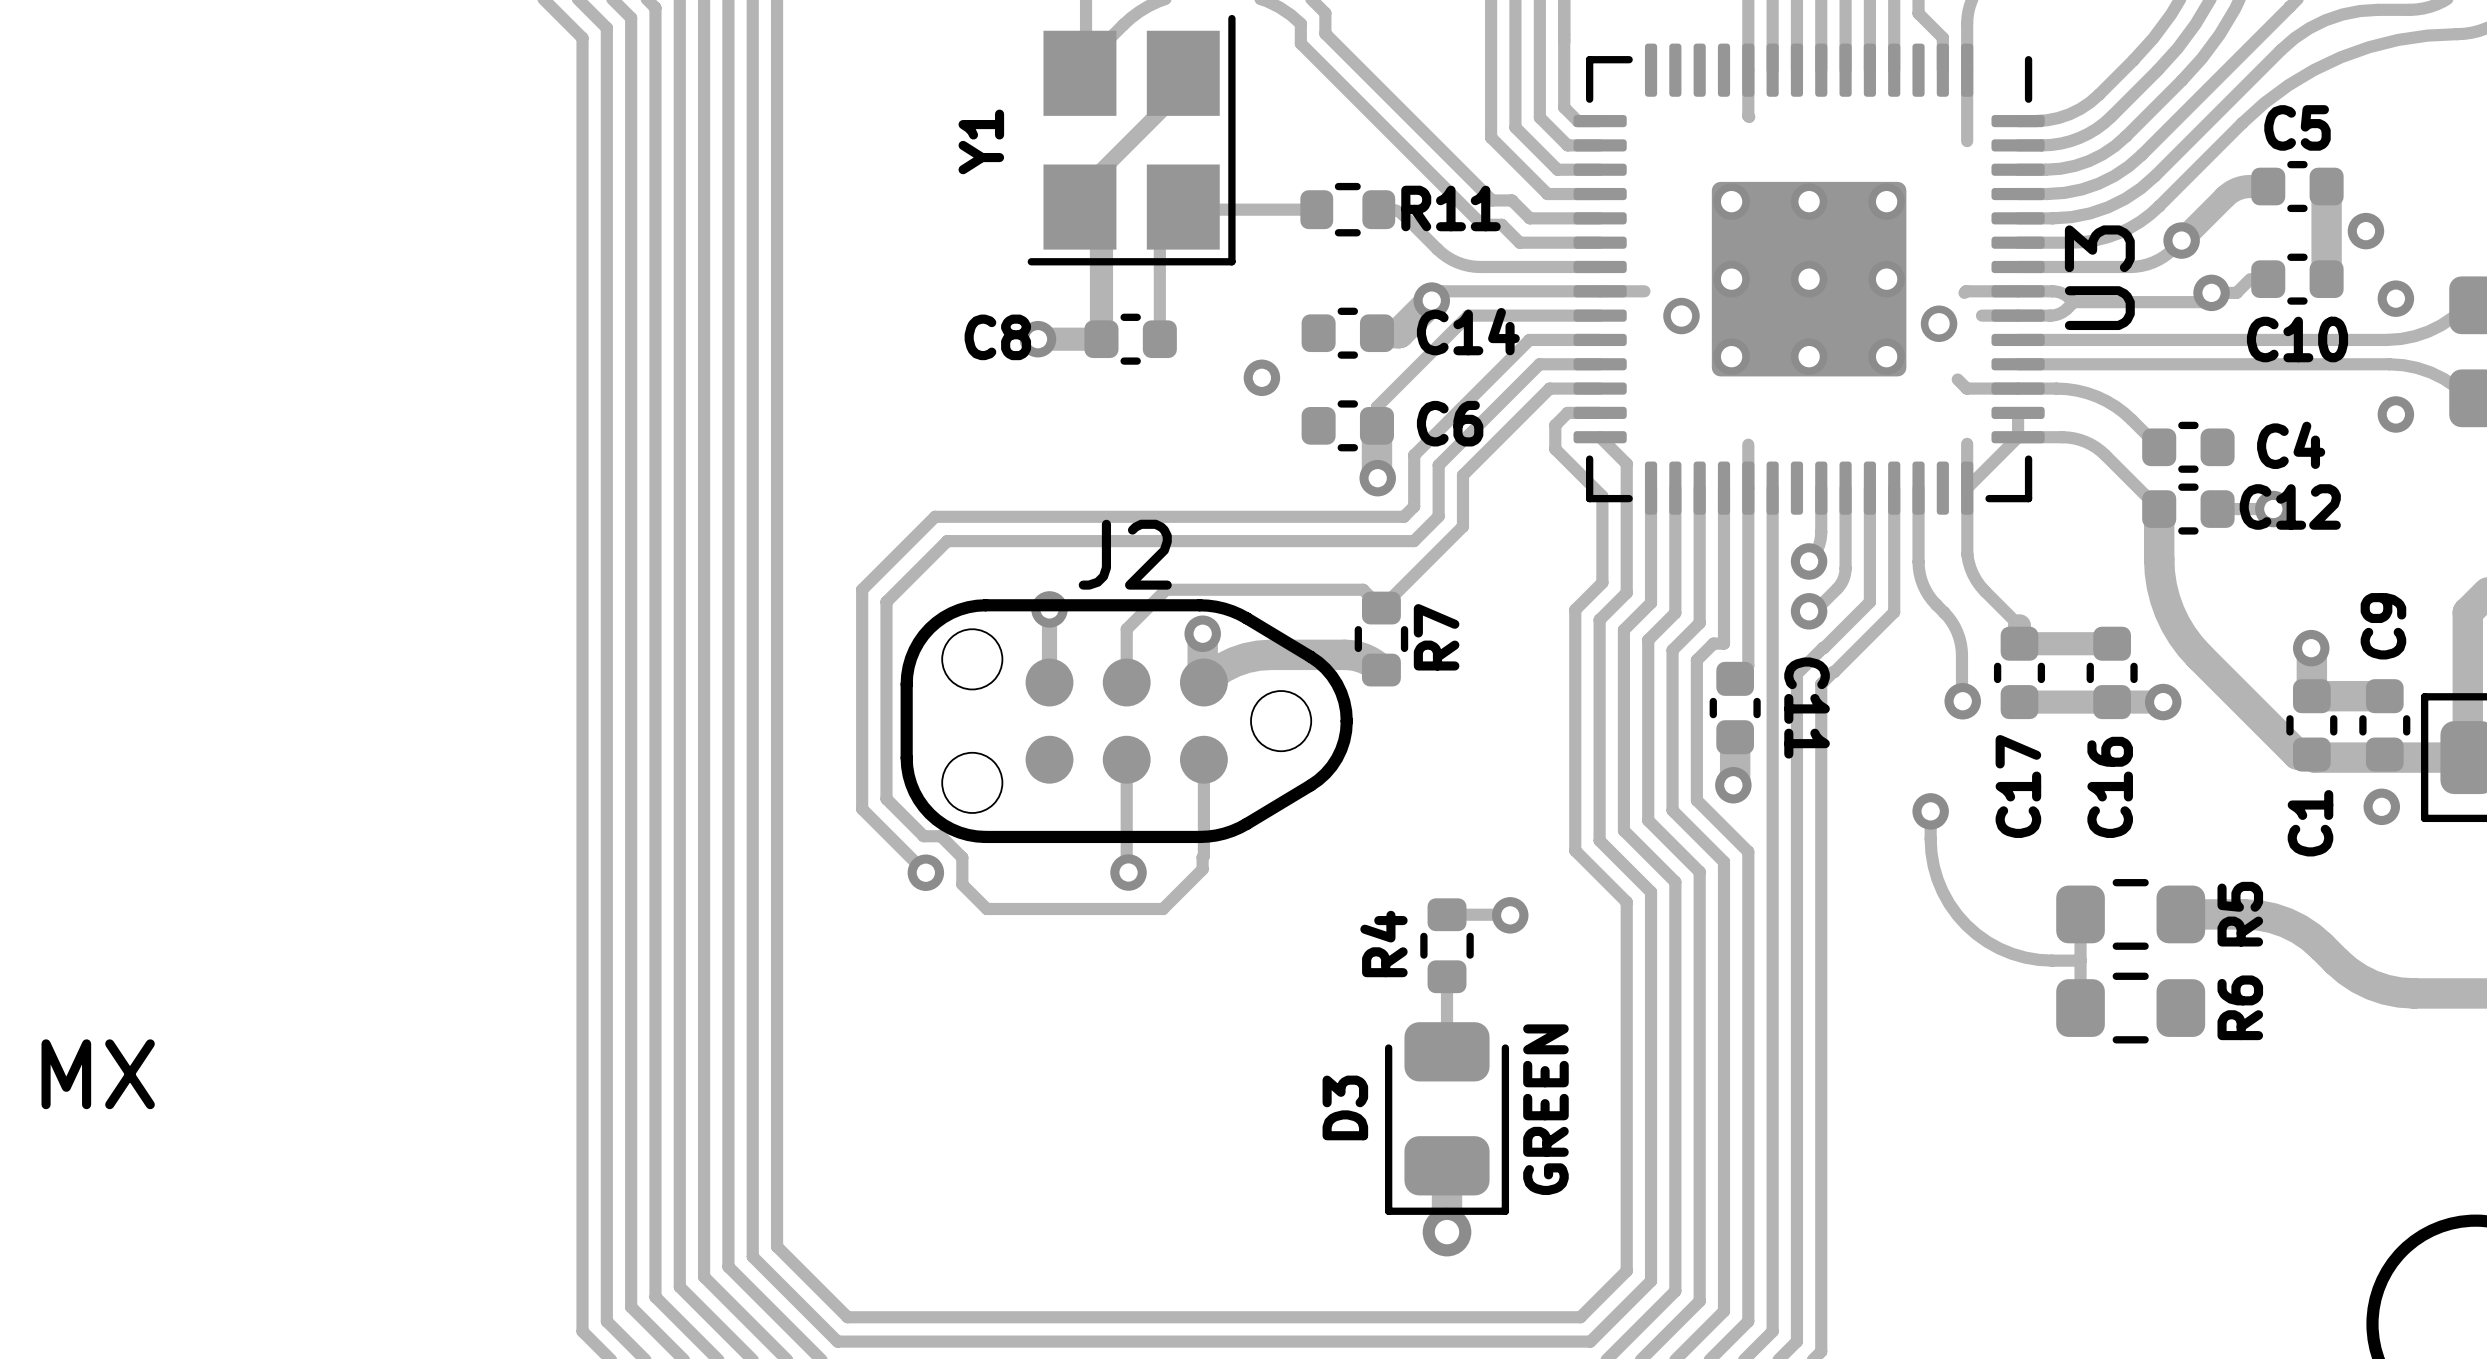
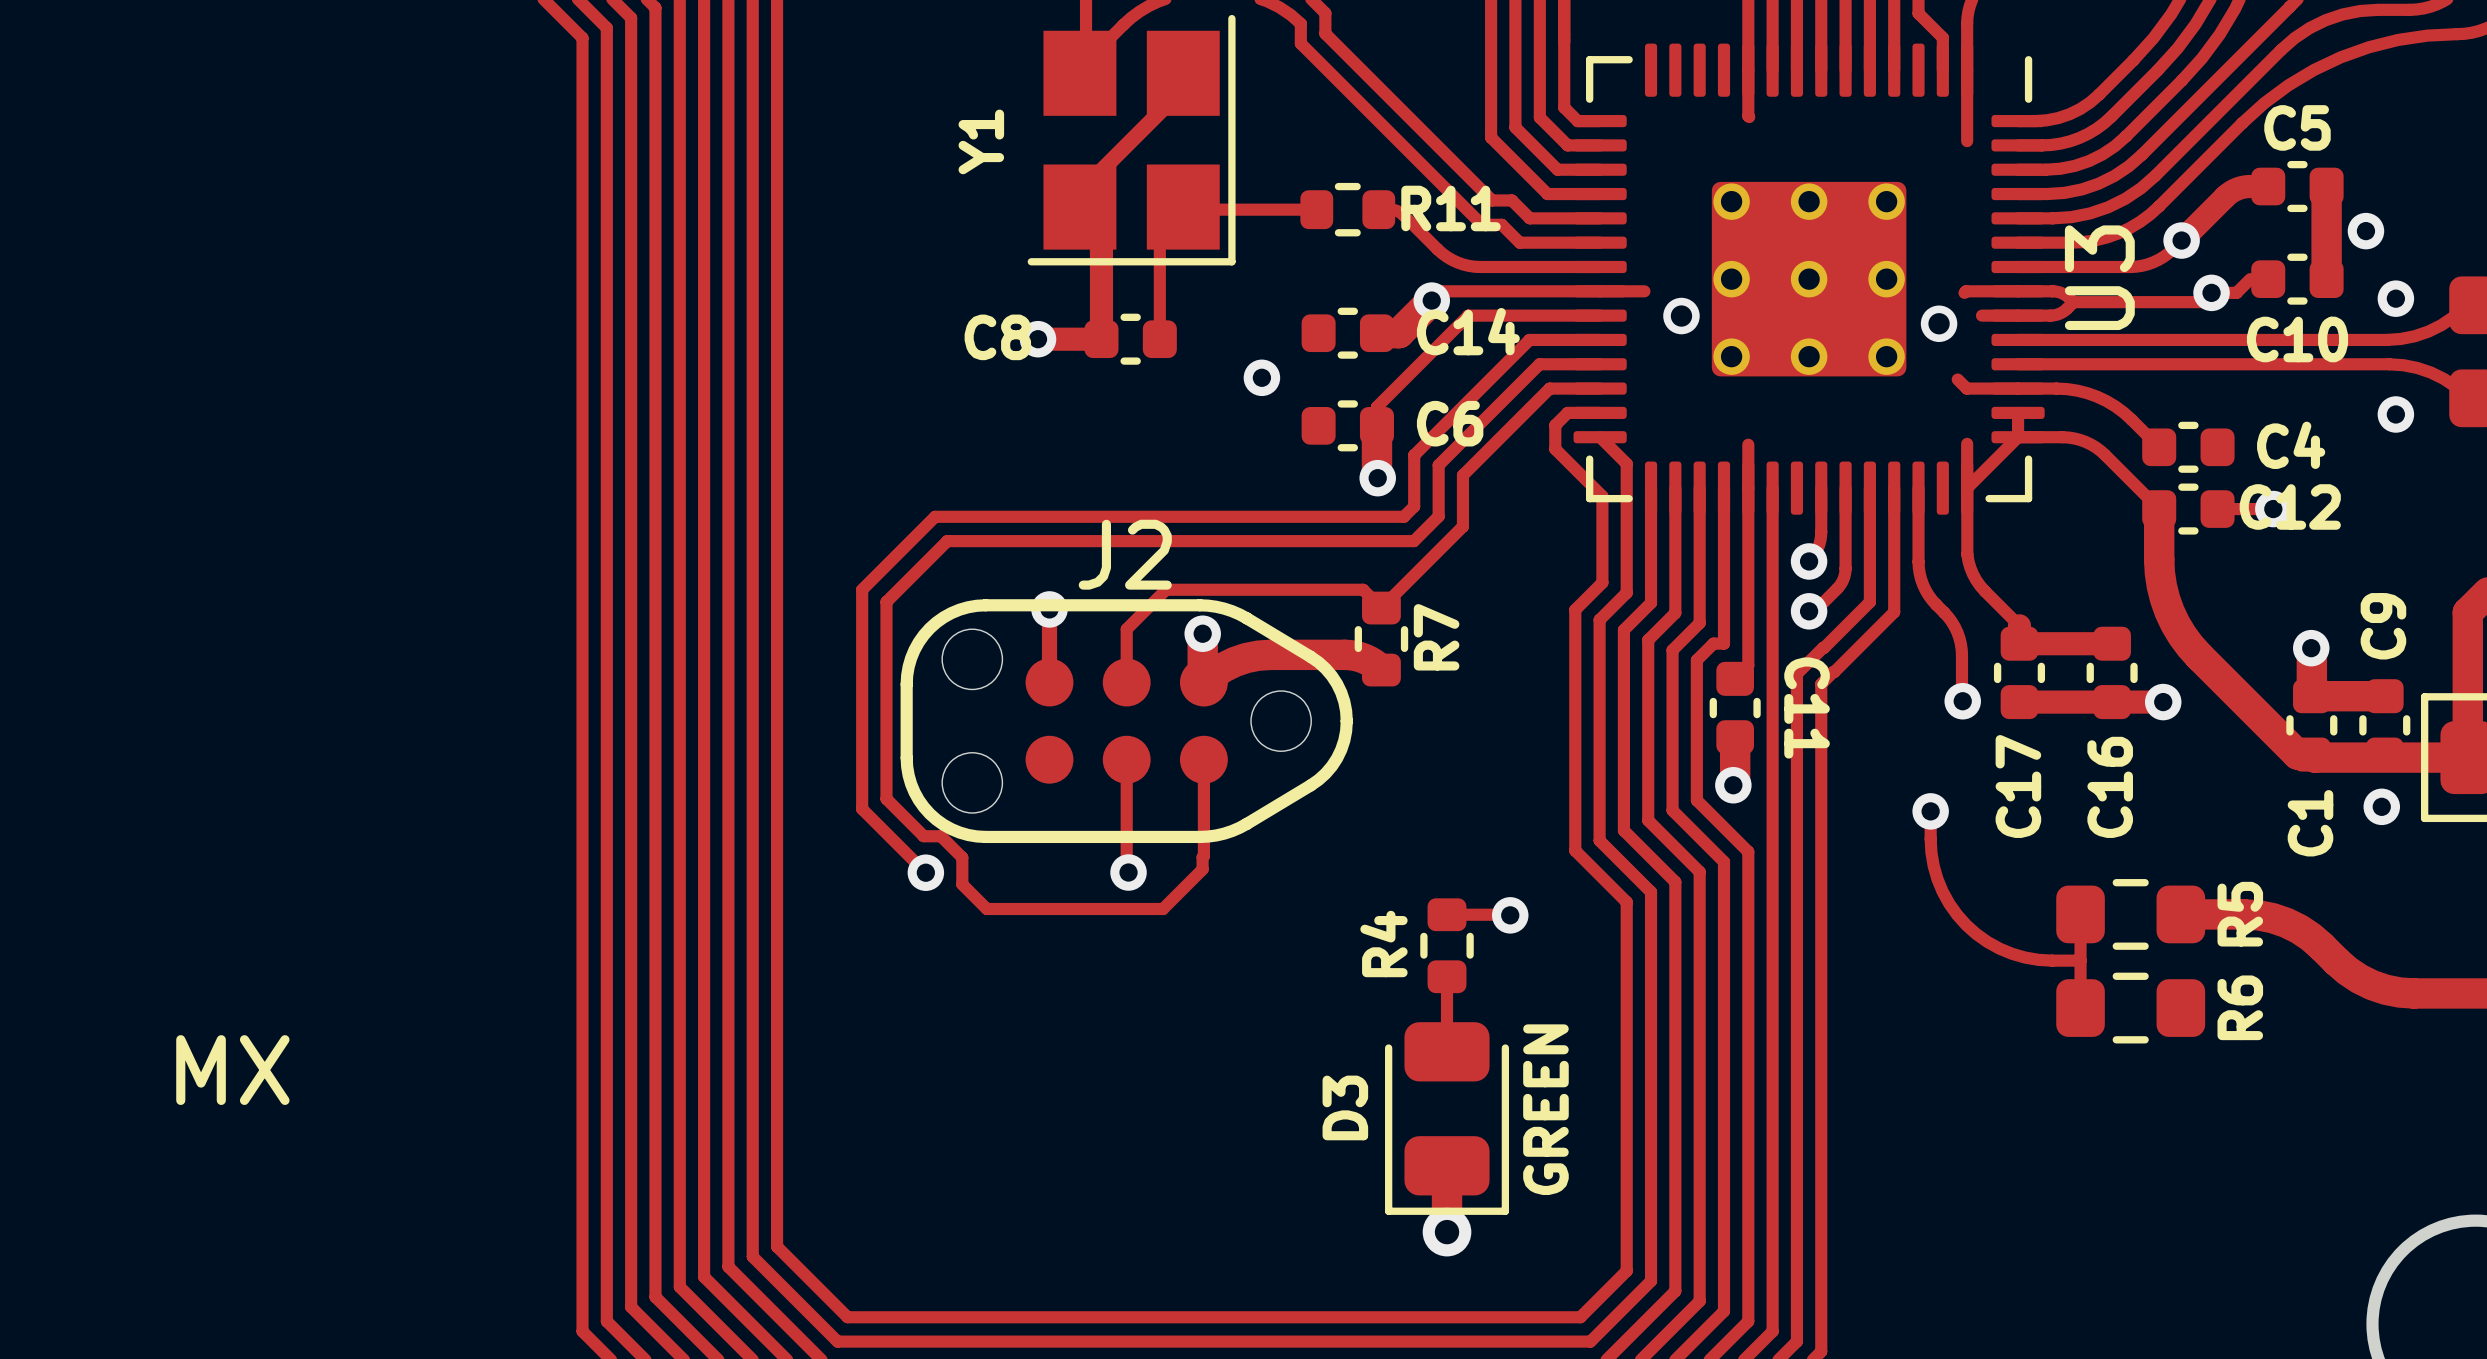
text position: MX (98, 1074) -> MX (232, 1070)

